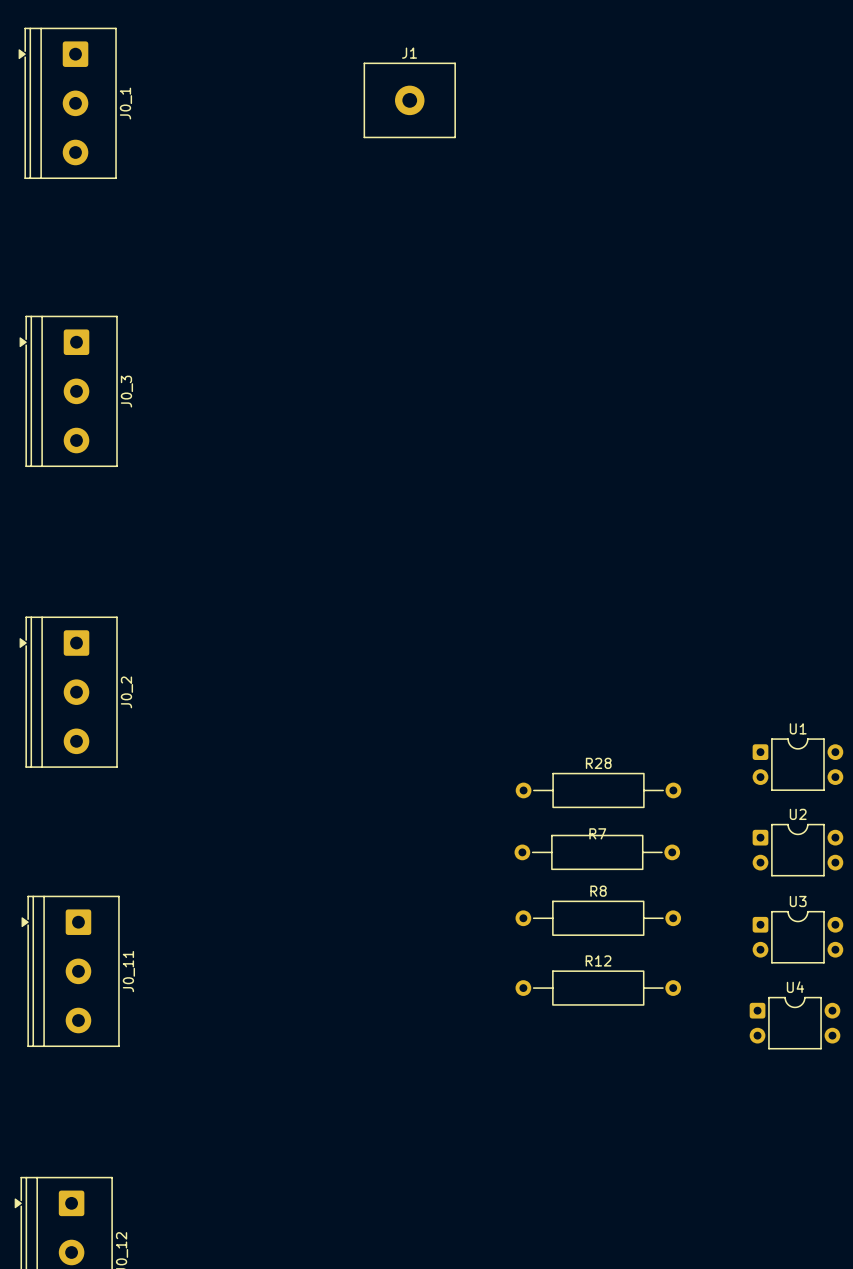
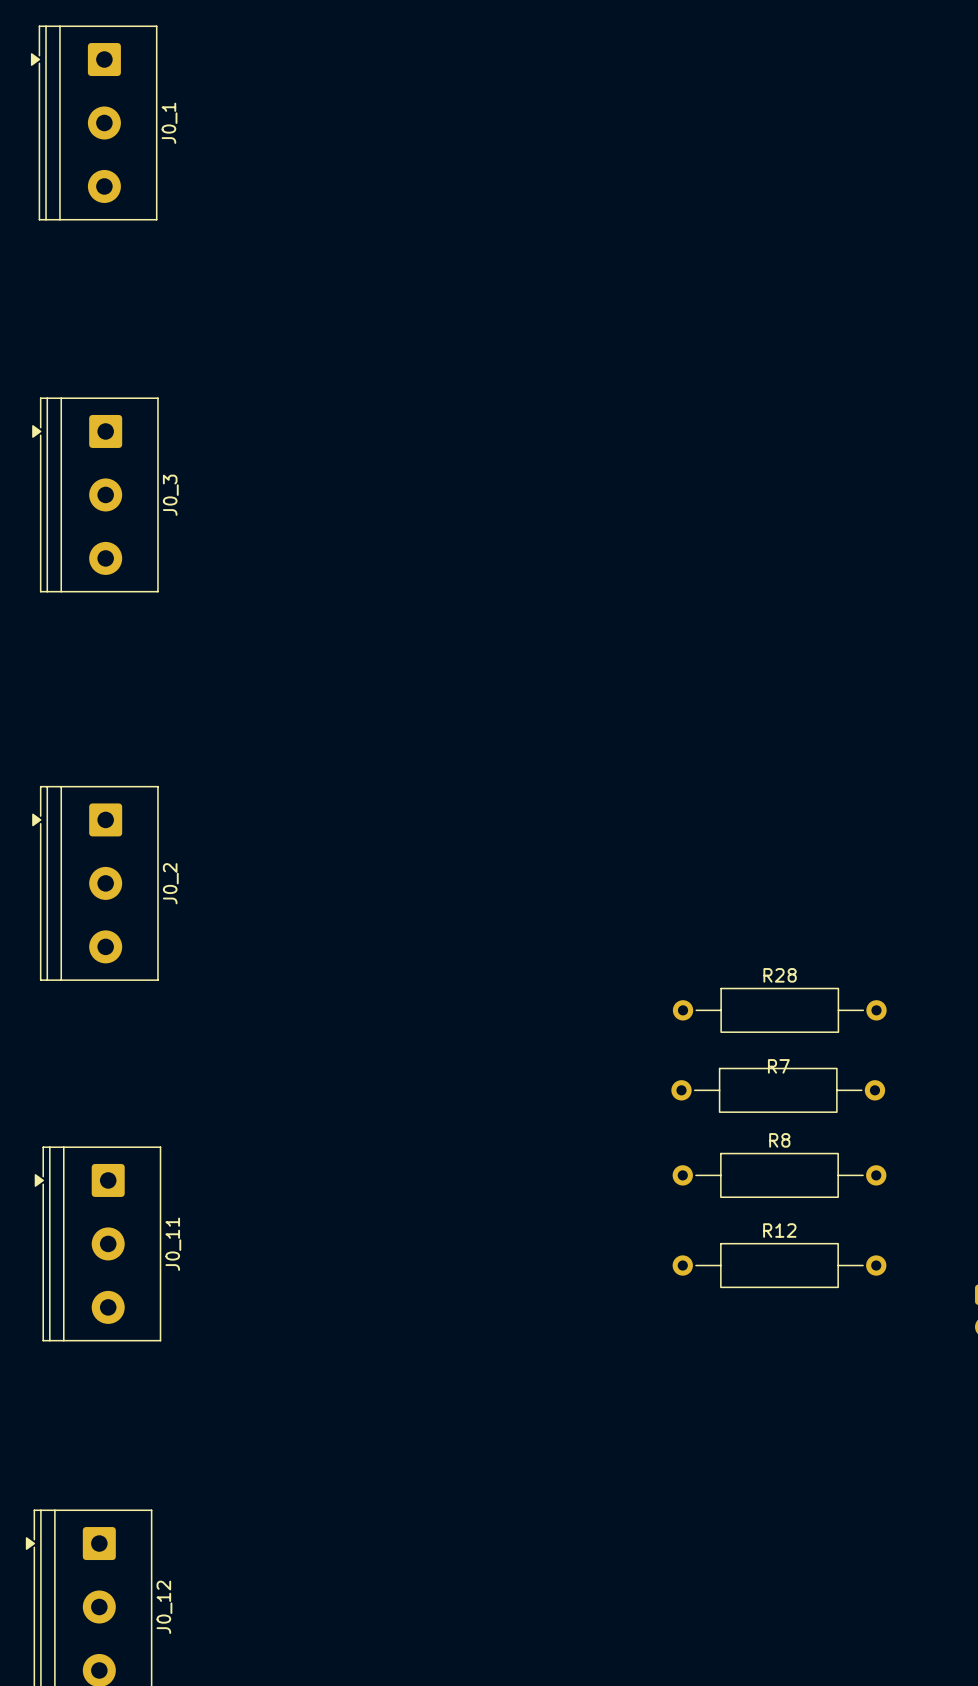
J1: (409, 100) -> none

